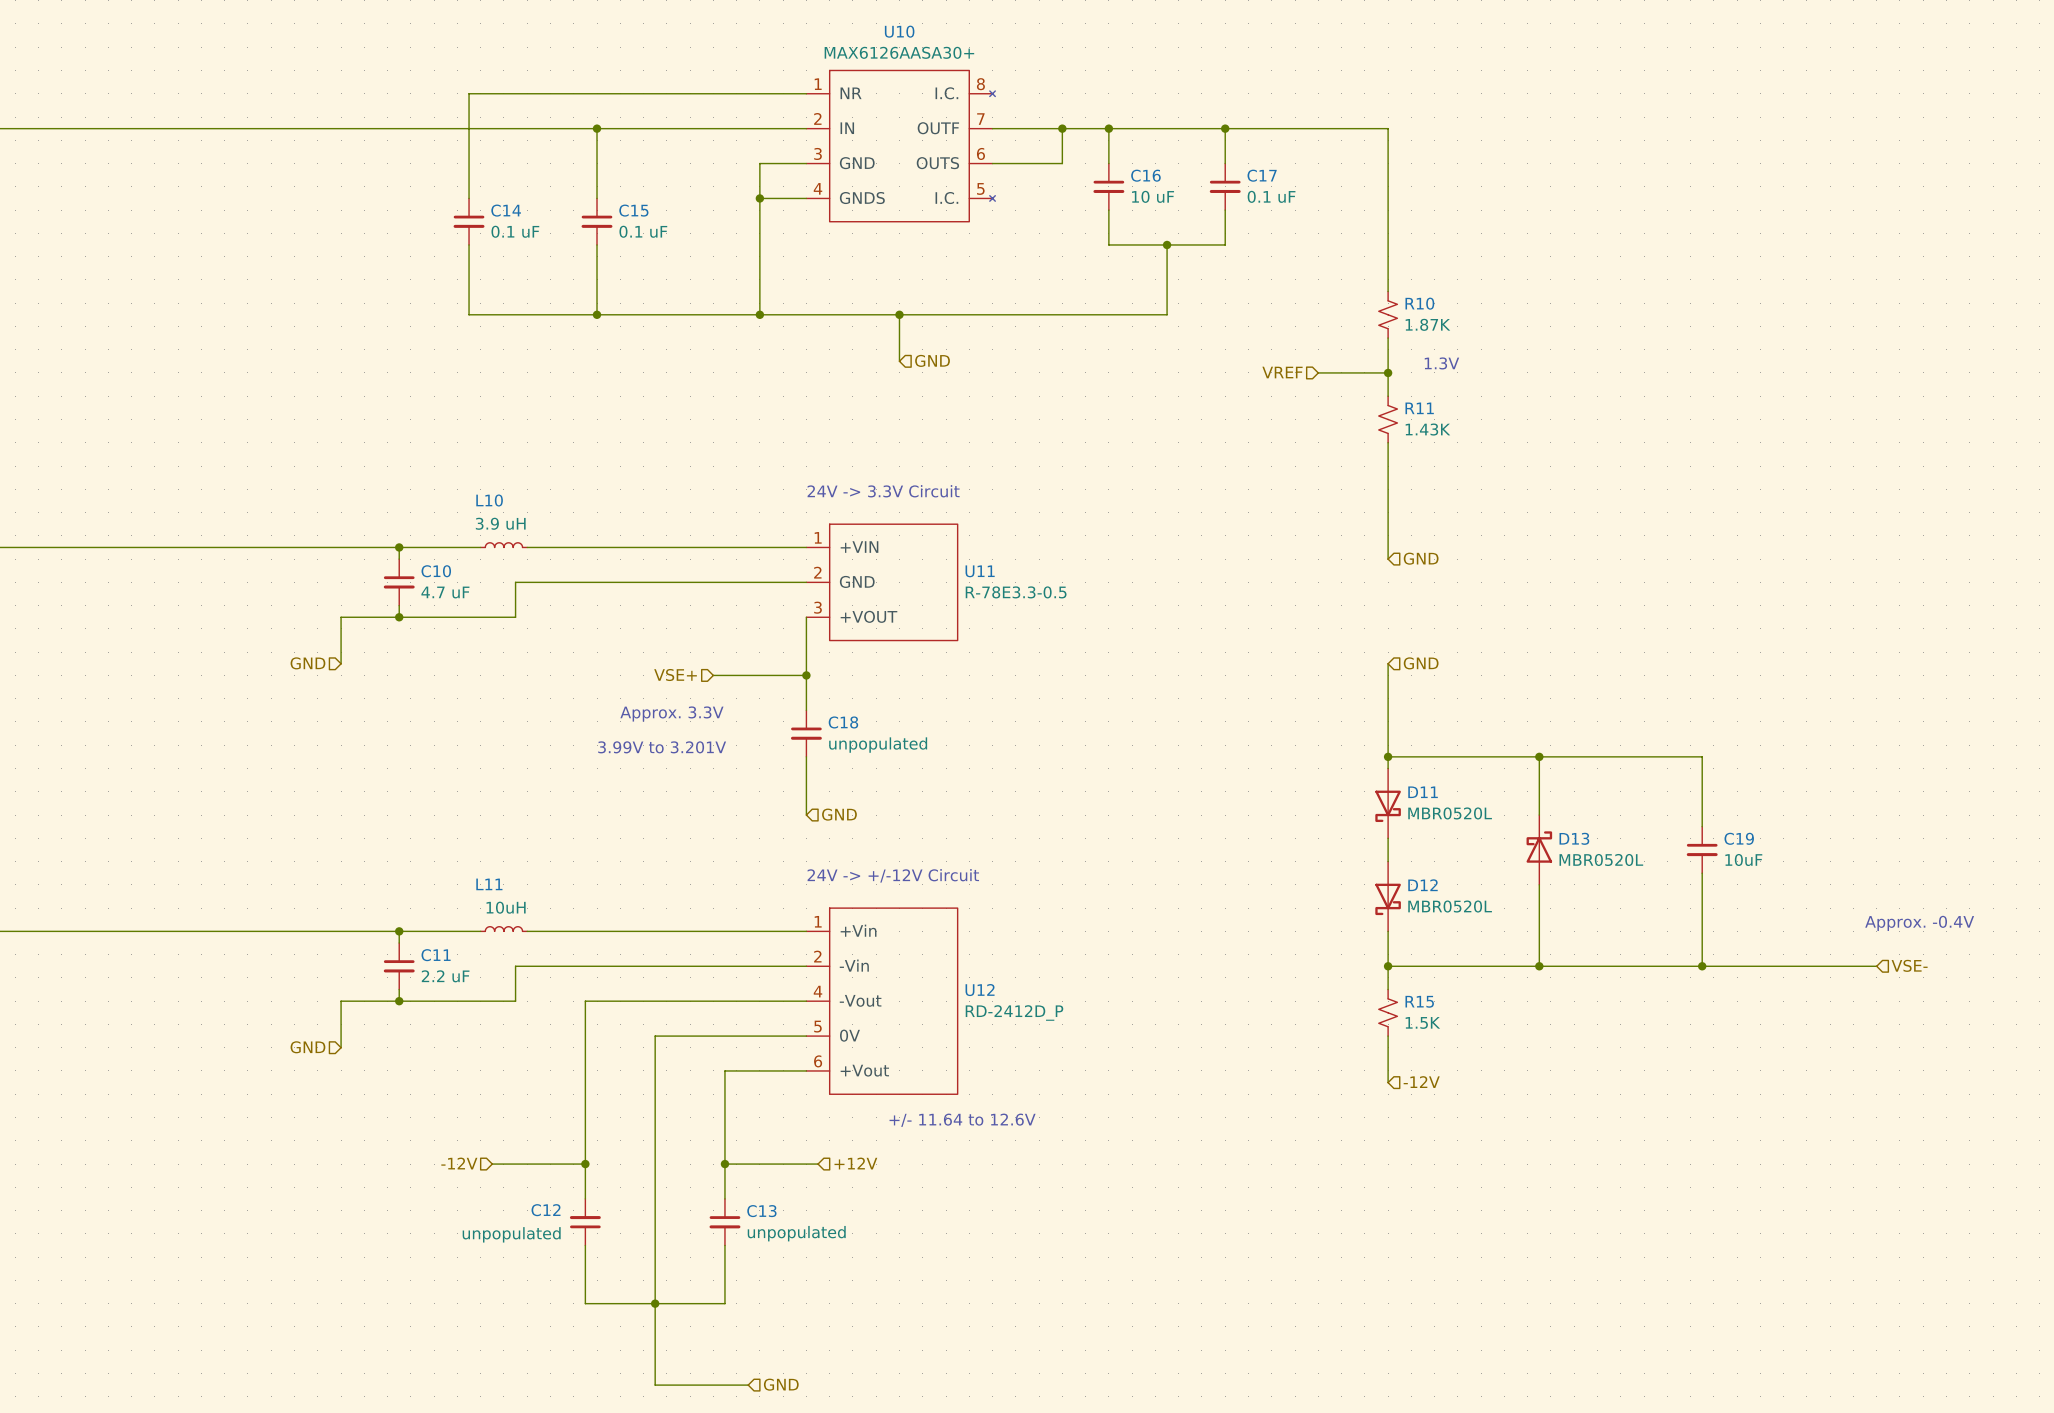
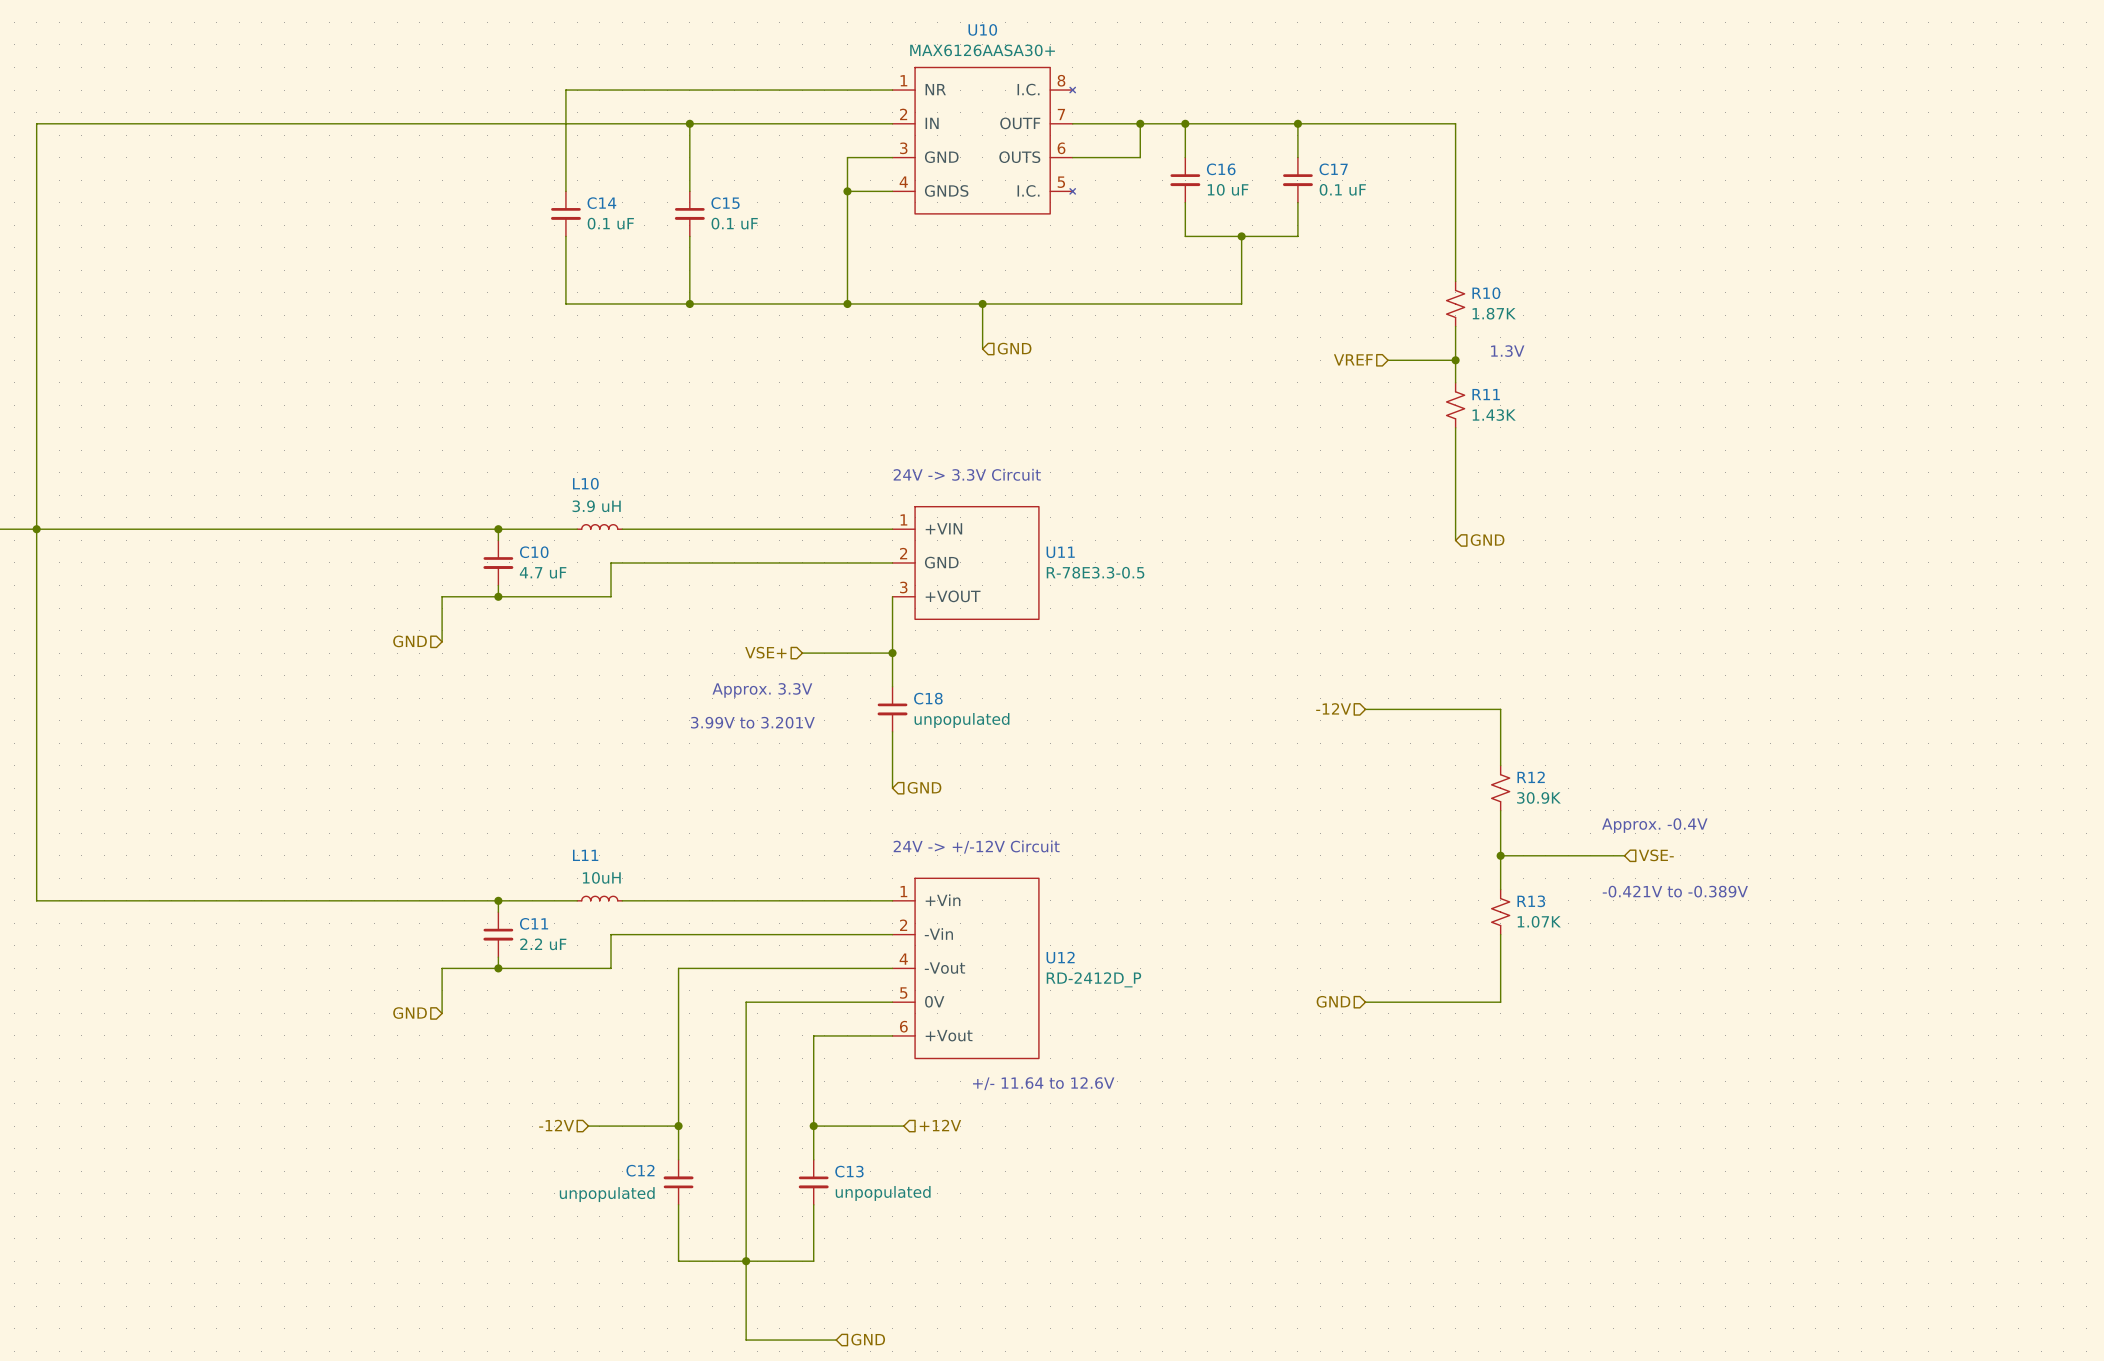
wire: (1388, 663) (1388, 768) -> none
hierarchical label: GND (1421, 663) -> none
hierarchical label: none -> -12V (1333, 708)
wire: none -> (1365, 709) (1500, 709) (1500, 765)
wire: (1388, 756) (1702, 756) (1702, 826) -> none
junction: (1388, 756) -> none
wire: (1539, 756) (1539, 815) -> none
junction: (1539, 756) -> none
D11: MBR0520L (1388, 803) -> none
R12: none -> 30.9K (1500, 788)
wire: (1388, 838) (1388, 861) -> none
D13: MBR0520L (1539, 849) -> none
C19: 10uF (1702, 849) -> none
text: none -> Approx. -0.4V (1654, 825)
wire: (1702, 873) (1702, 966) -> none
wire: none -> (1500, 855) (1624, 855)
junction: none -> (1500, 855)
wire: (1539, 884) (1539, 966) -> (1500, 810) (1500, 889)
hierarchical label: none -> VSE- (1656, 855)
D12: MBR0520L (1388, 896) -> none
text: none -> -0.421V to -0.389V (1675, 891)
text: Approx. -0.4V (1919, 923) -> none
wire: (1388, 931) (1388, 989) -> none
R13: none -> 1.07K (1500, 912)
hierarchical label: VSE- (1909, 965) -> none
wire: (1388, 966) (1876, 966) -> none
junction: (1388, 966) -> none
wire: none -> (1500, 934) (1500, 1002) (1365, 1002)
junction: (1539, 966) -> none
junction: (1702, 966) -> none
R15: 1.5K (1388, 1012) -> none
hierarchical label: none -> GND (1333, 1001)
wire: (1388, 1036) (1388, 1082) -> none
hierarchical label: -12V (1421, 1082) -> none

